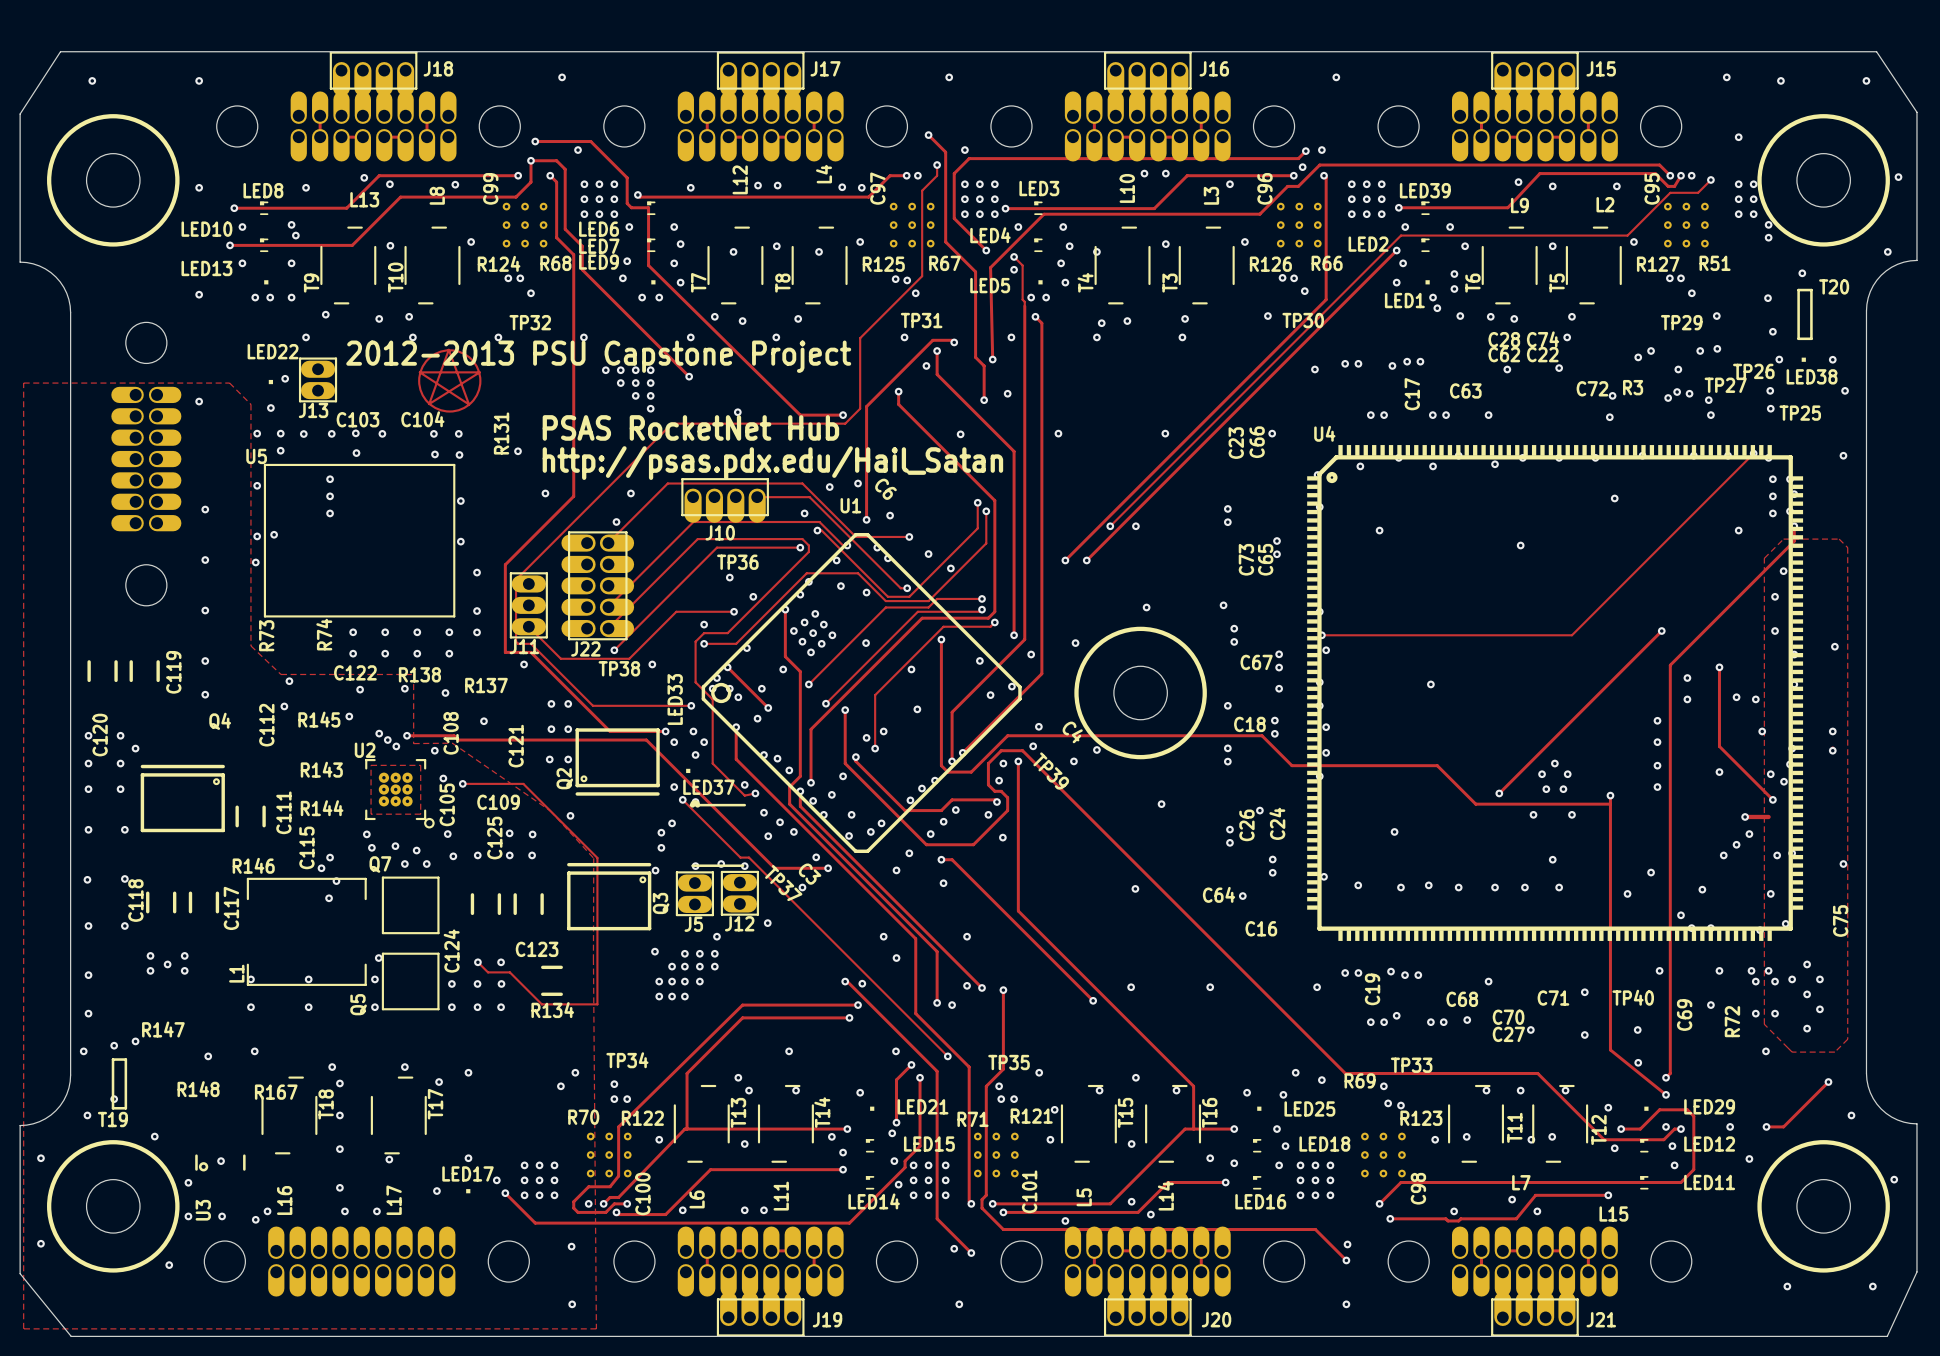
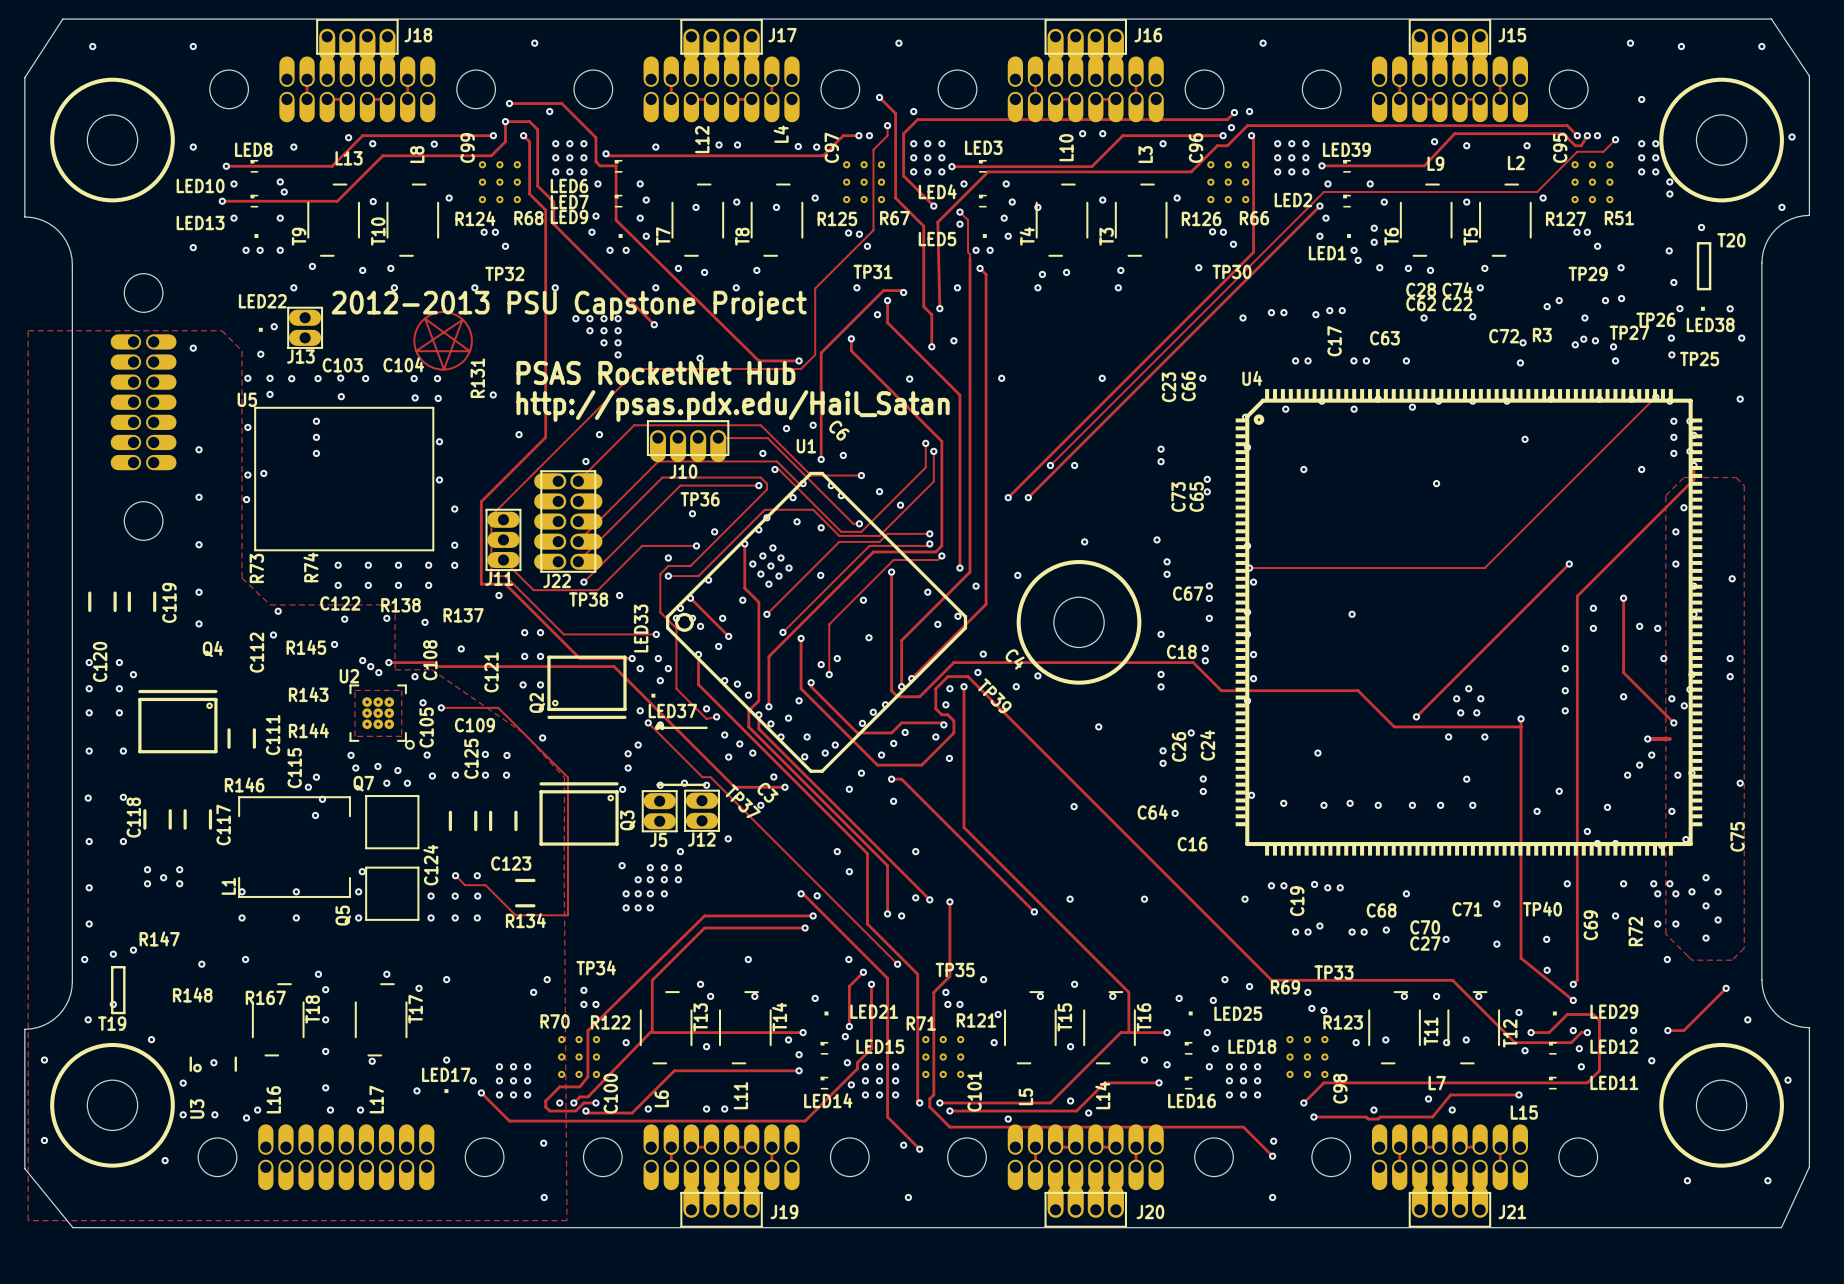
track: (448, 349) (429, 404) (479, 372) (419, 372) (469, 404) (448, 349) -> none
track: none -> (425, 318) (444, 369) (462, 319) (416, 351) (469, 351) (425, 318)
drawing position: (449, 380) -> (443, 340)

